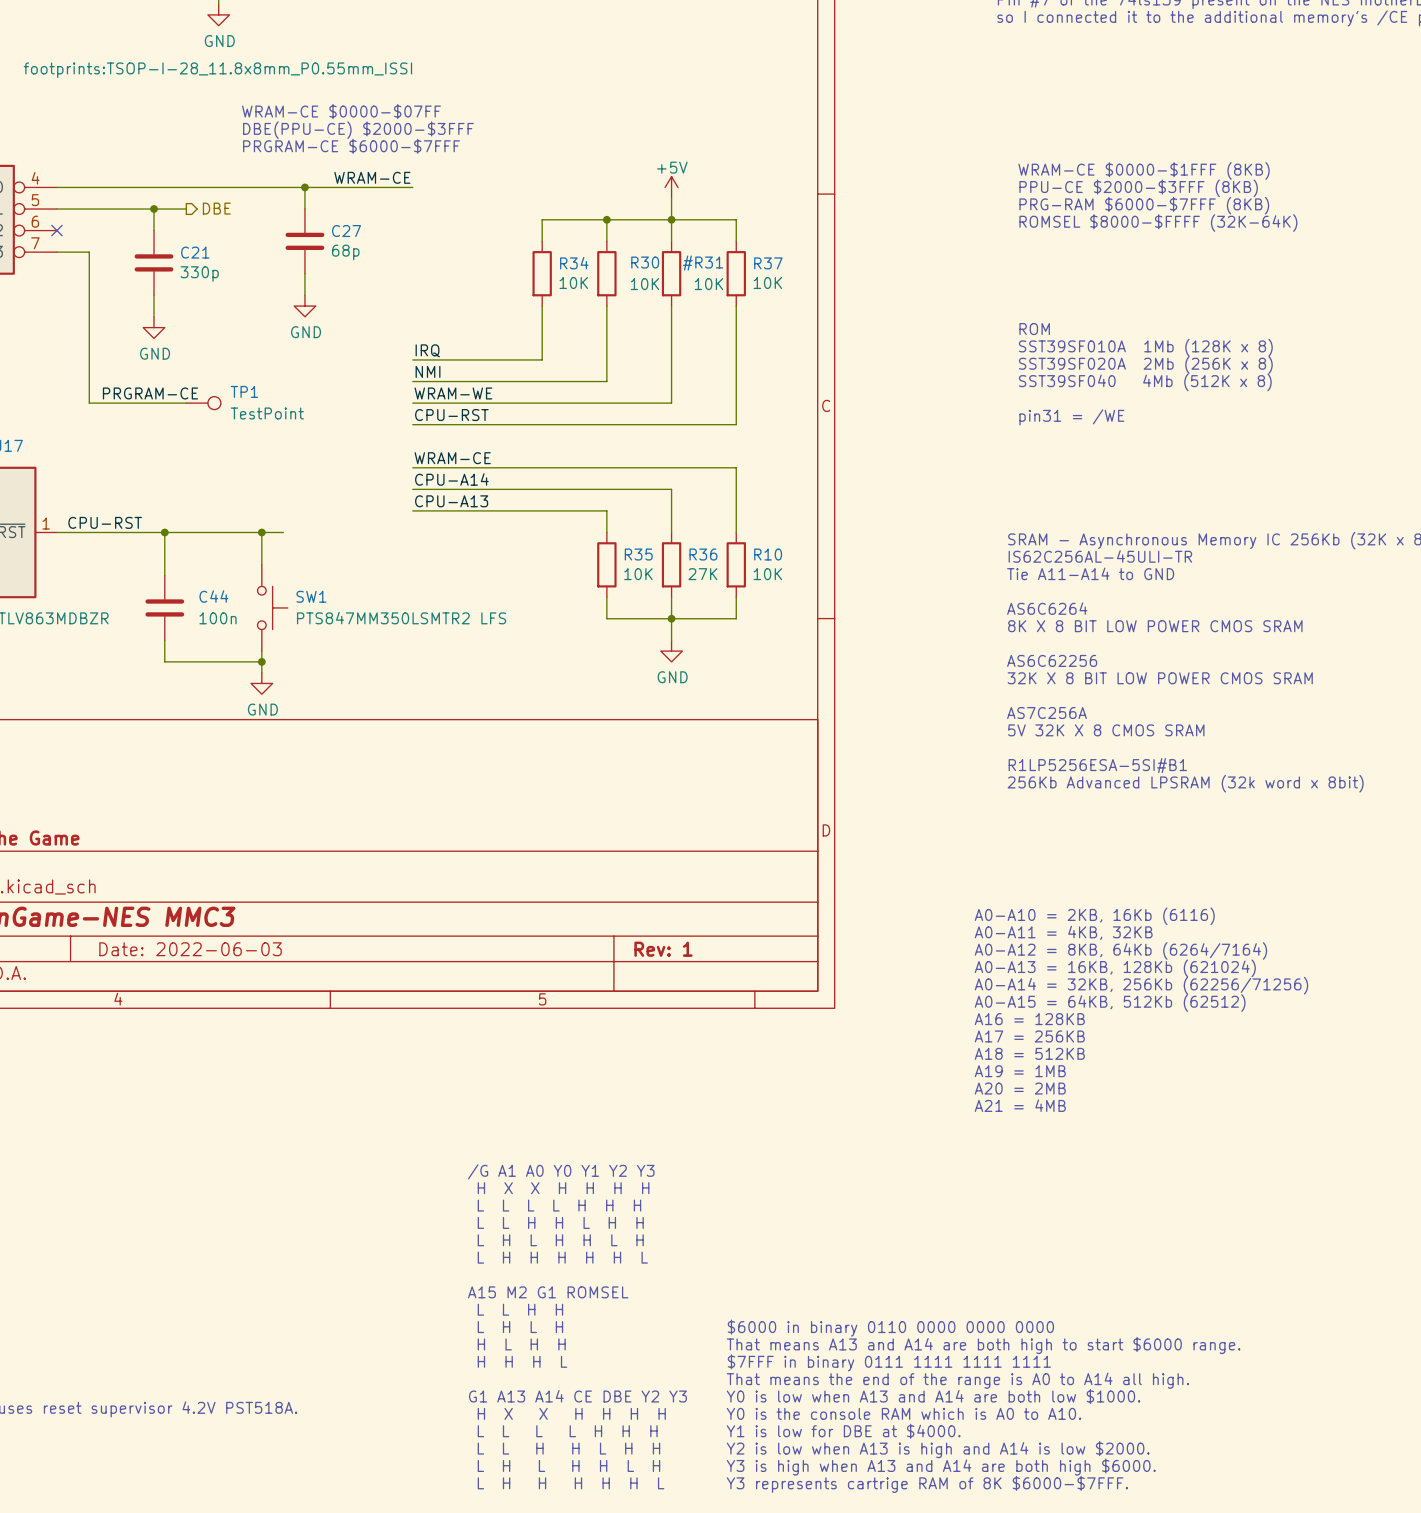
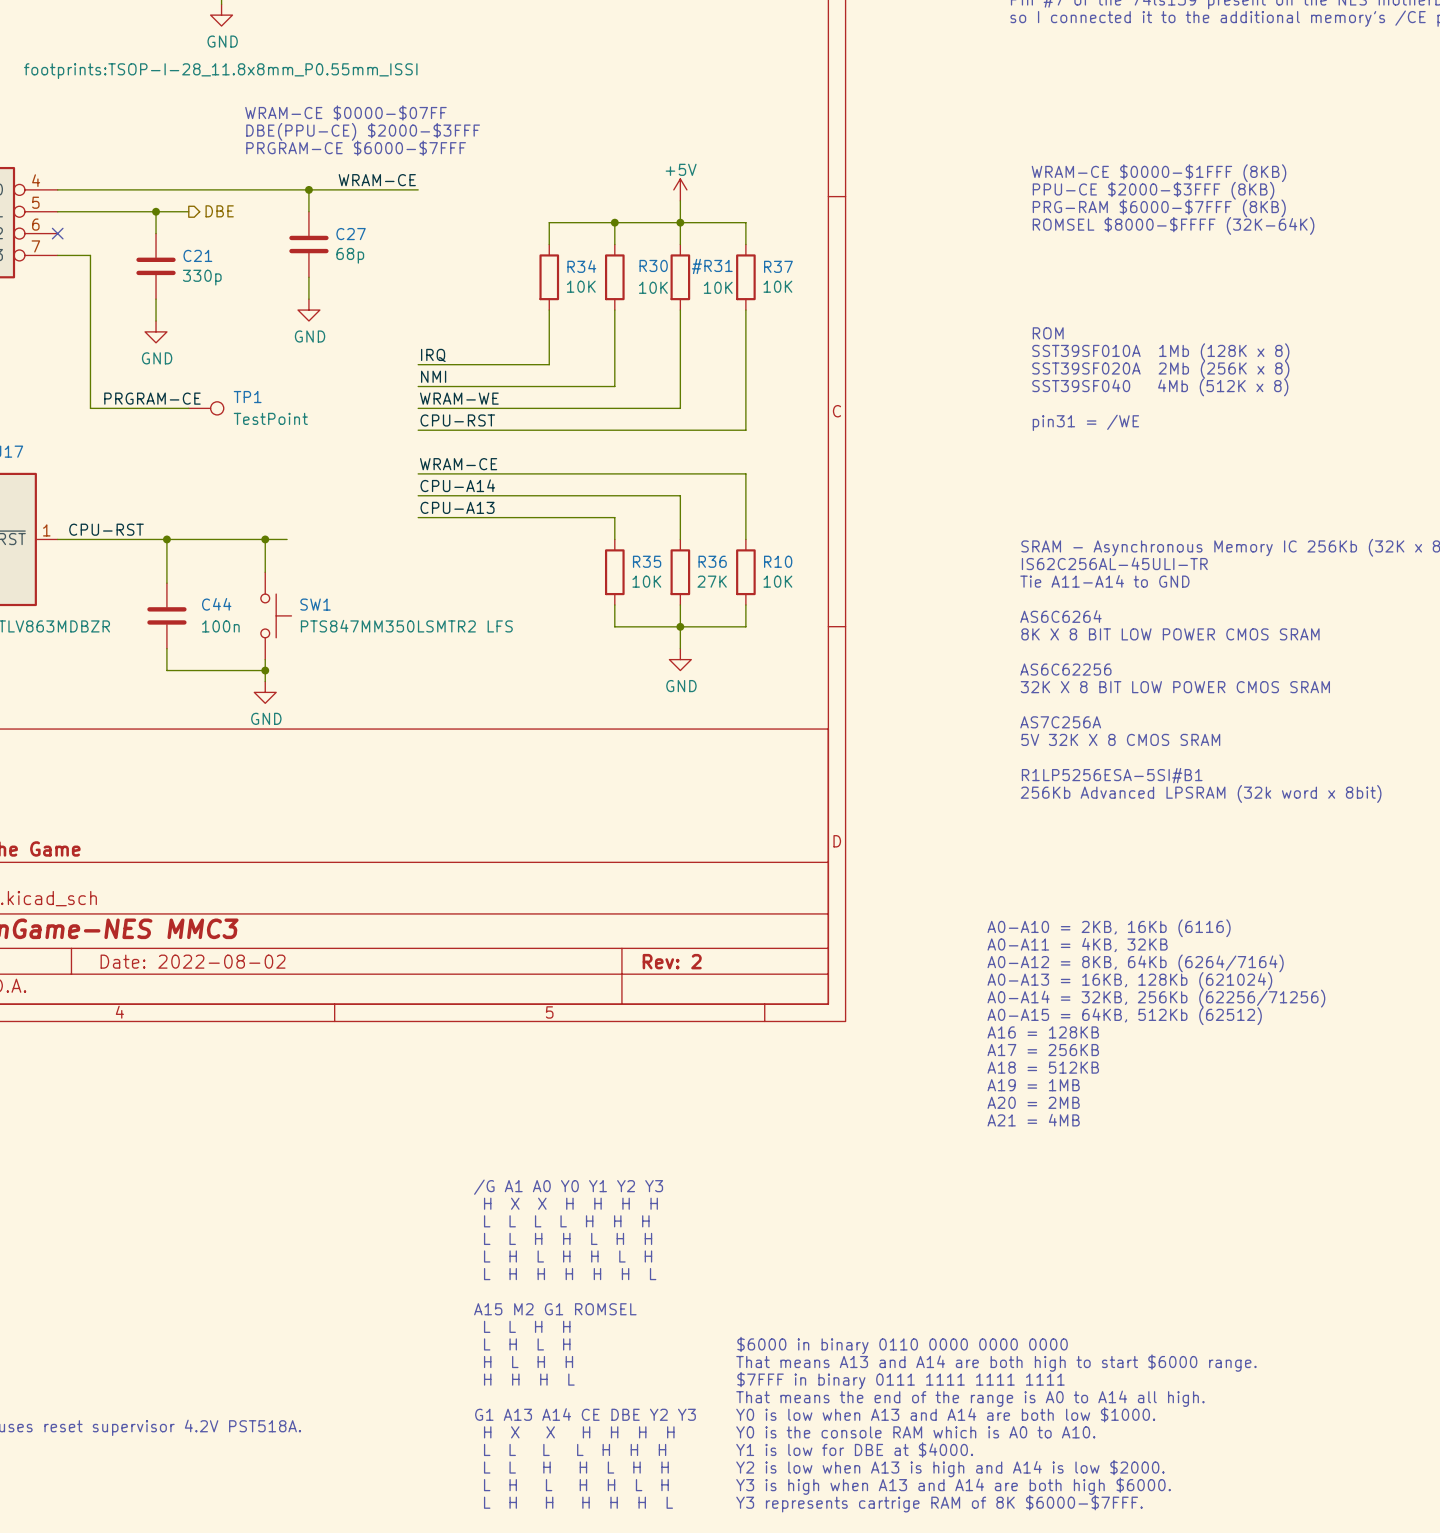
title block: Date: 2022-06-03 (190, 949) -> Date: 2022-08-02 (193, 961)
title block: Rev: 1 (663, 949) -> Rev: 2 (672, 961)

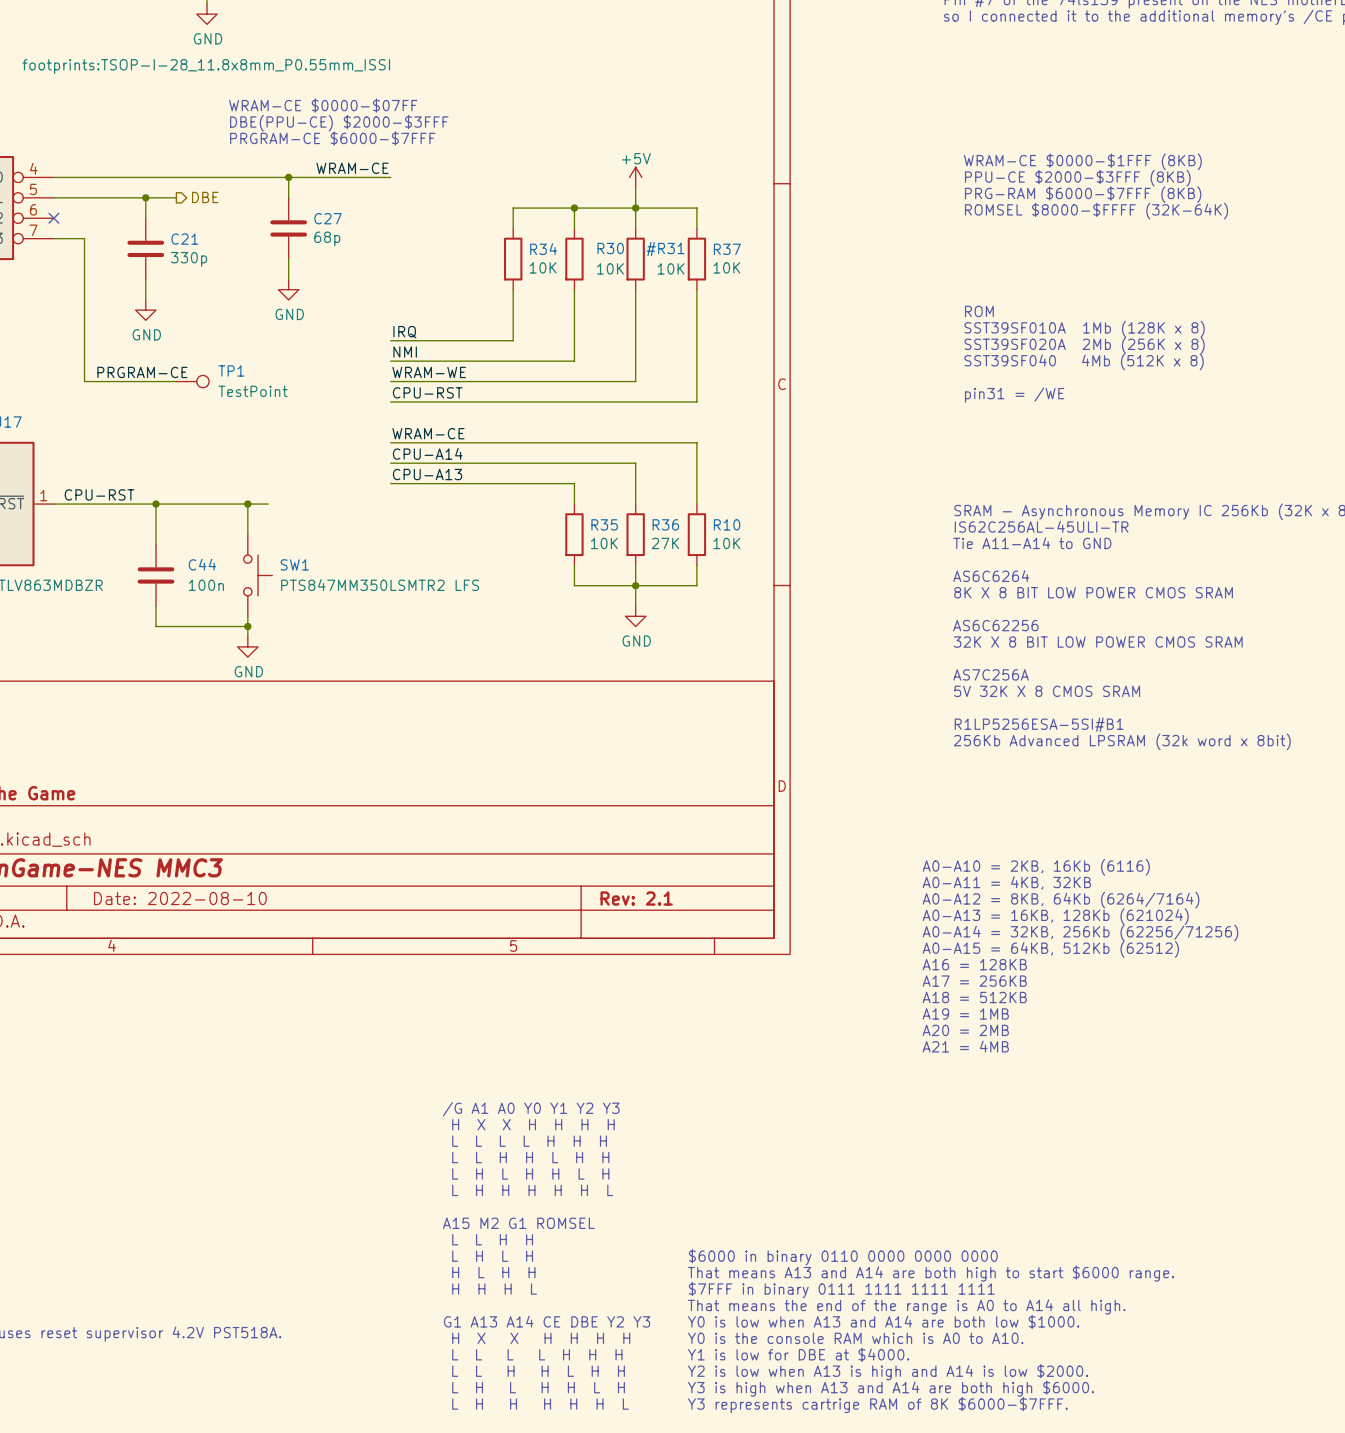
title block: Date: 2022-08-02 (193, 961) -> Date: 2022-08-10 (180, 898)
title block: Rev: 2 (672, 961) -> Rev: 2.1 (636, 898)

